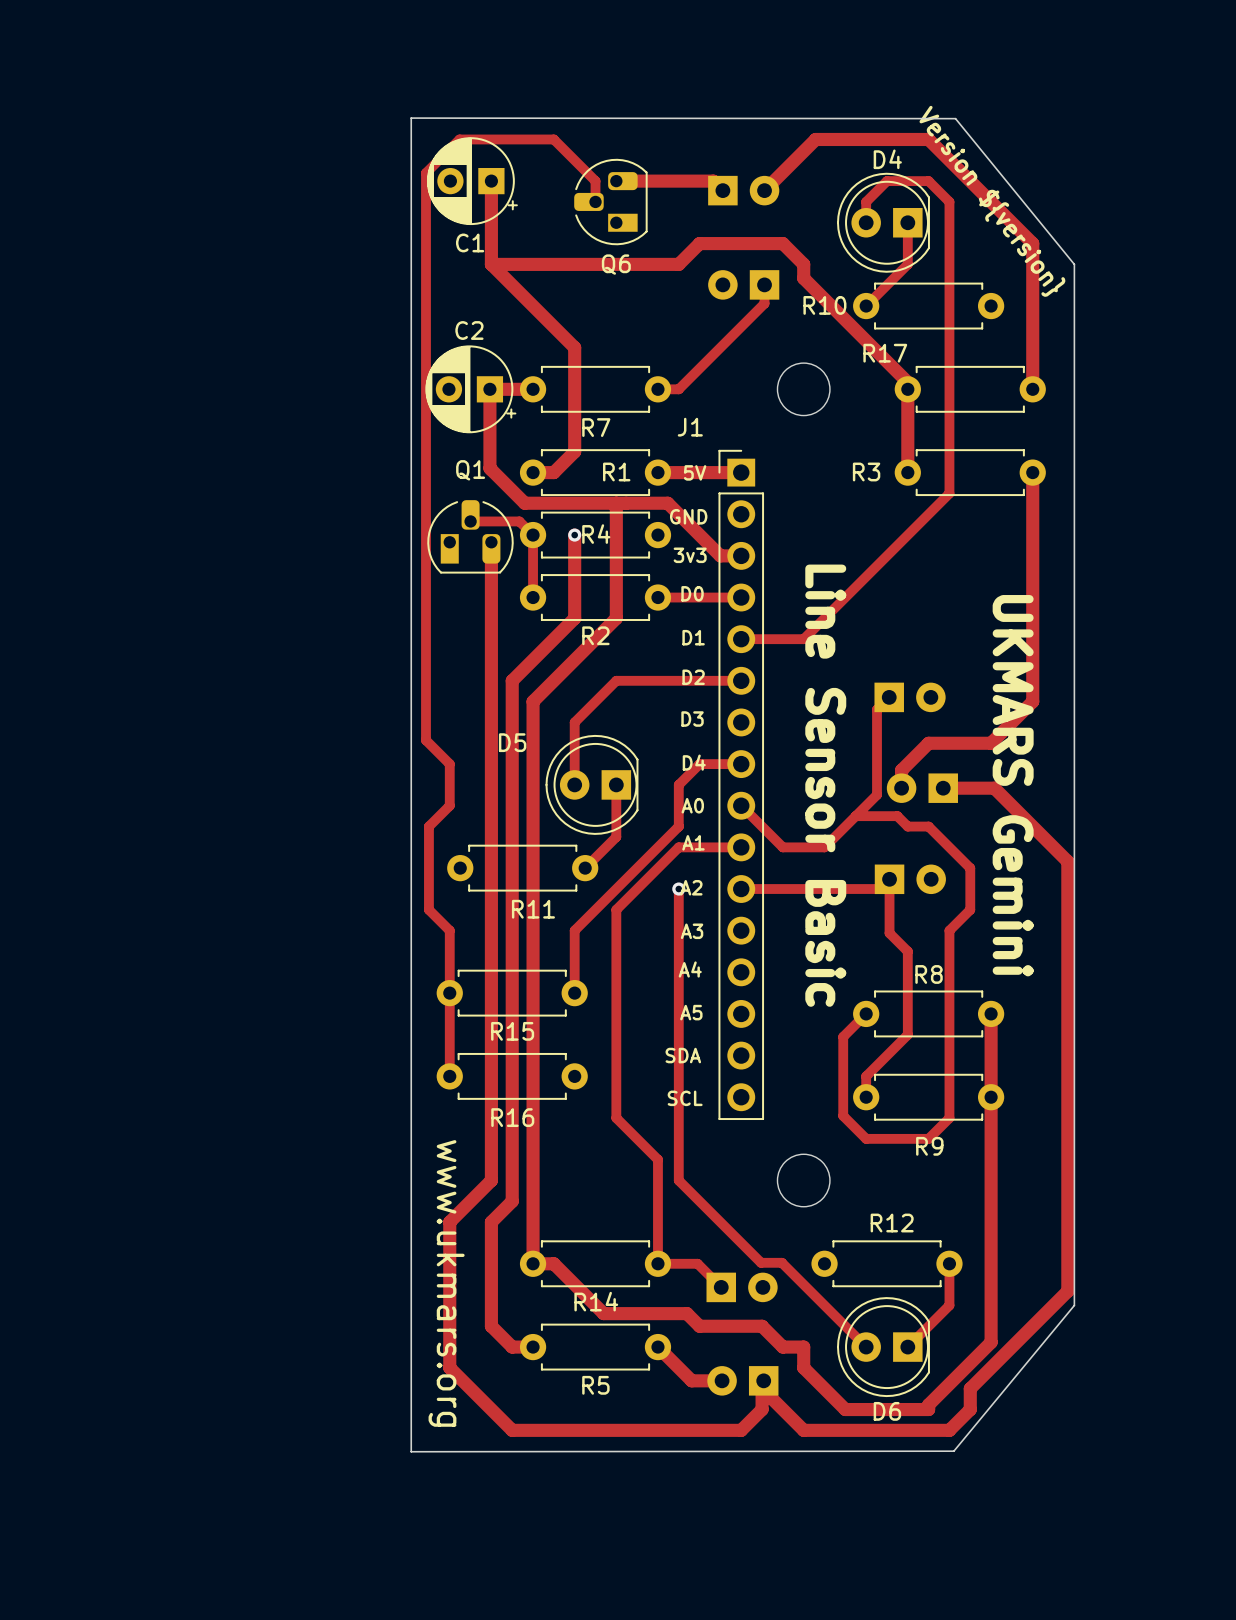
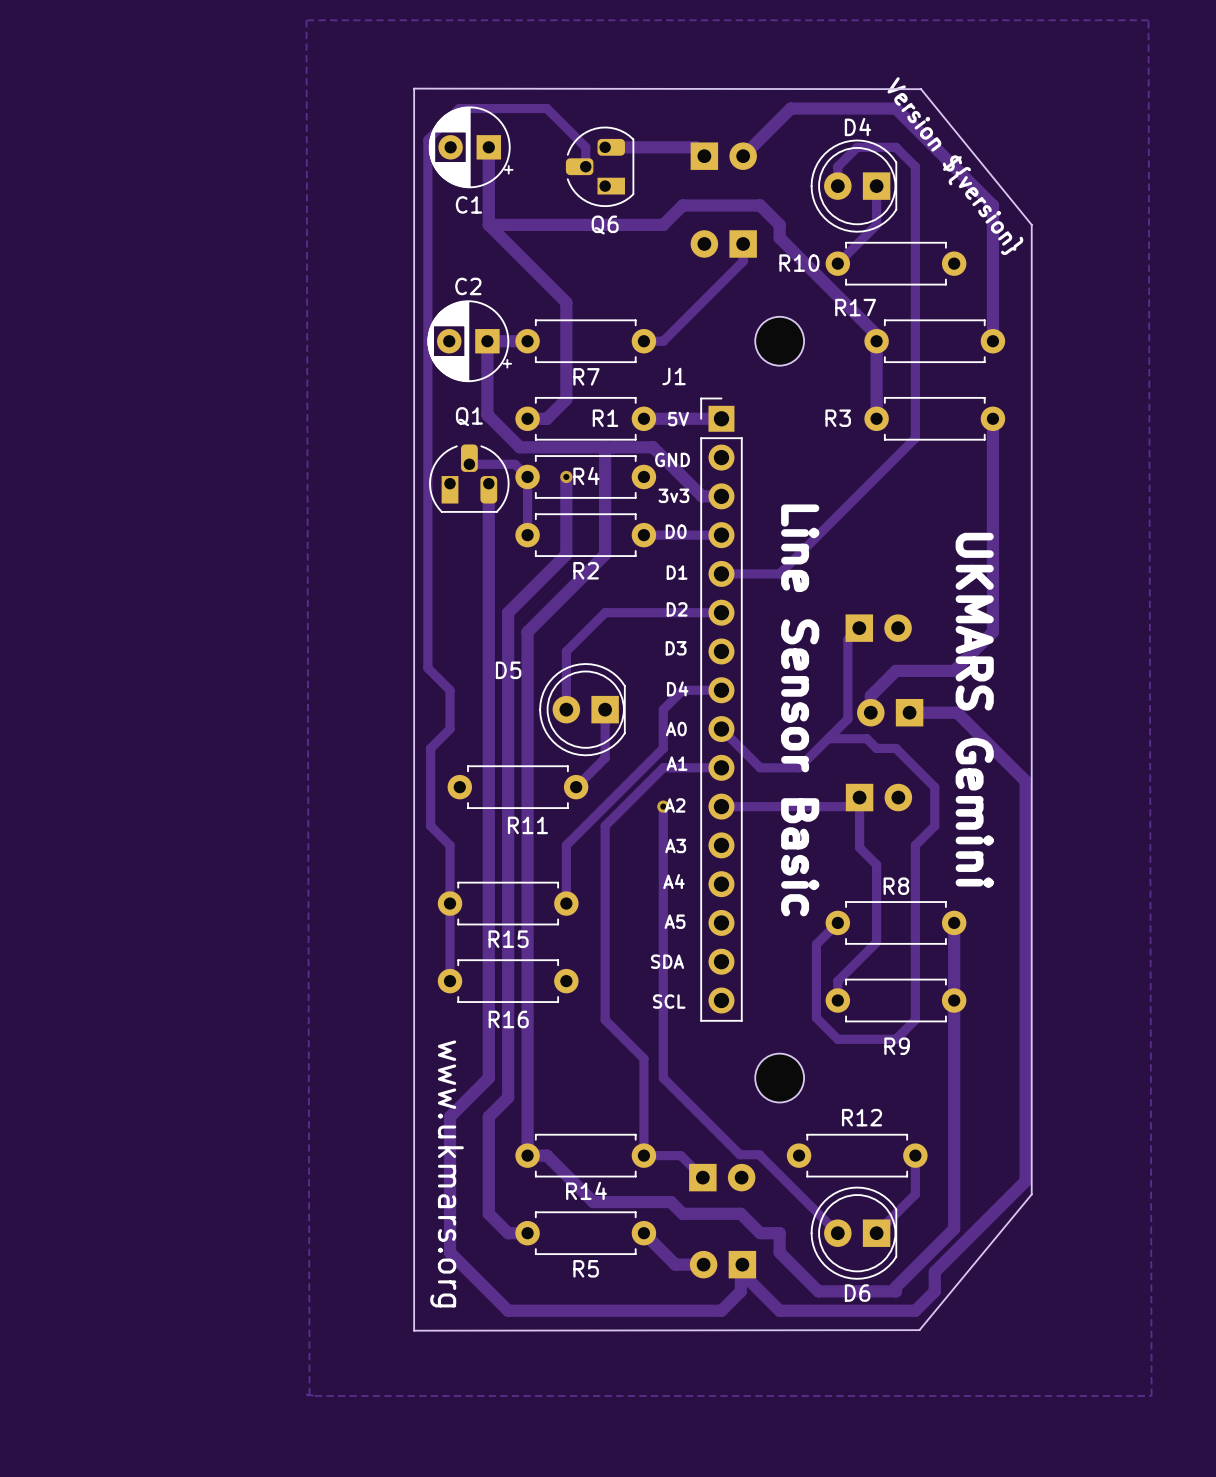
zone outline: none -> (306, 20) (1148, 20) (1151, 1395) (314, 1395) (306, 1394) (309, 1395) (306, 20)

